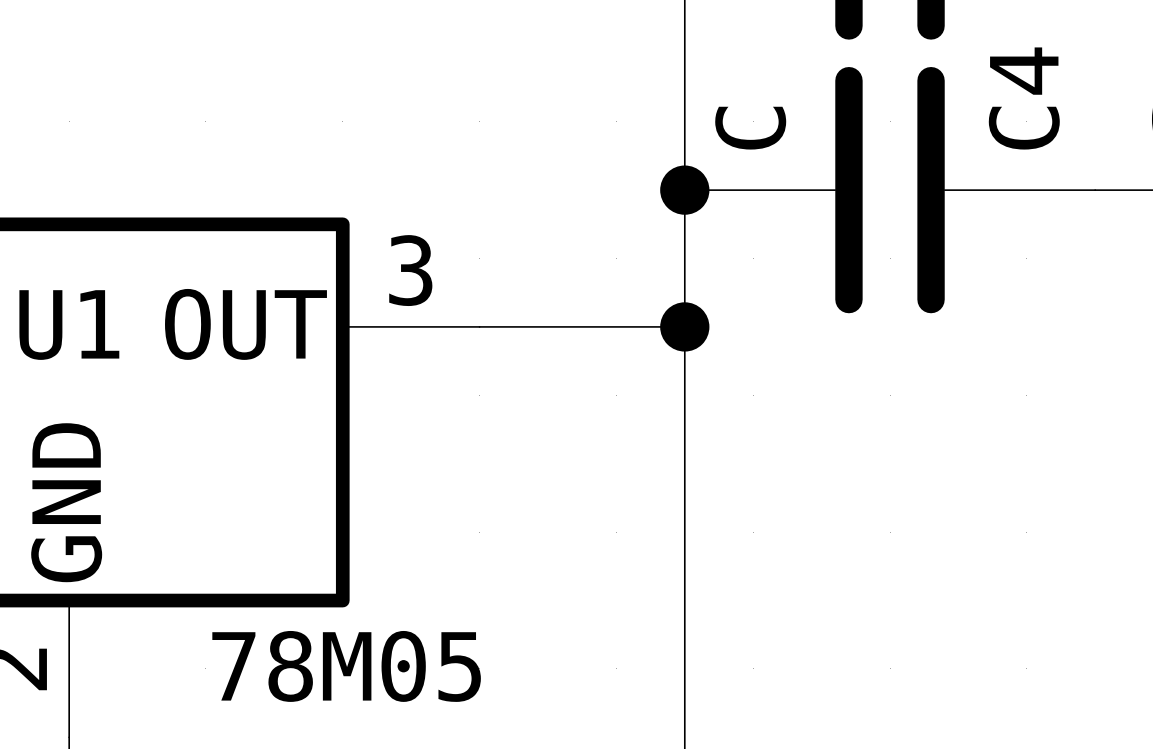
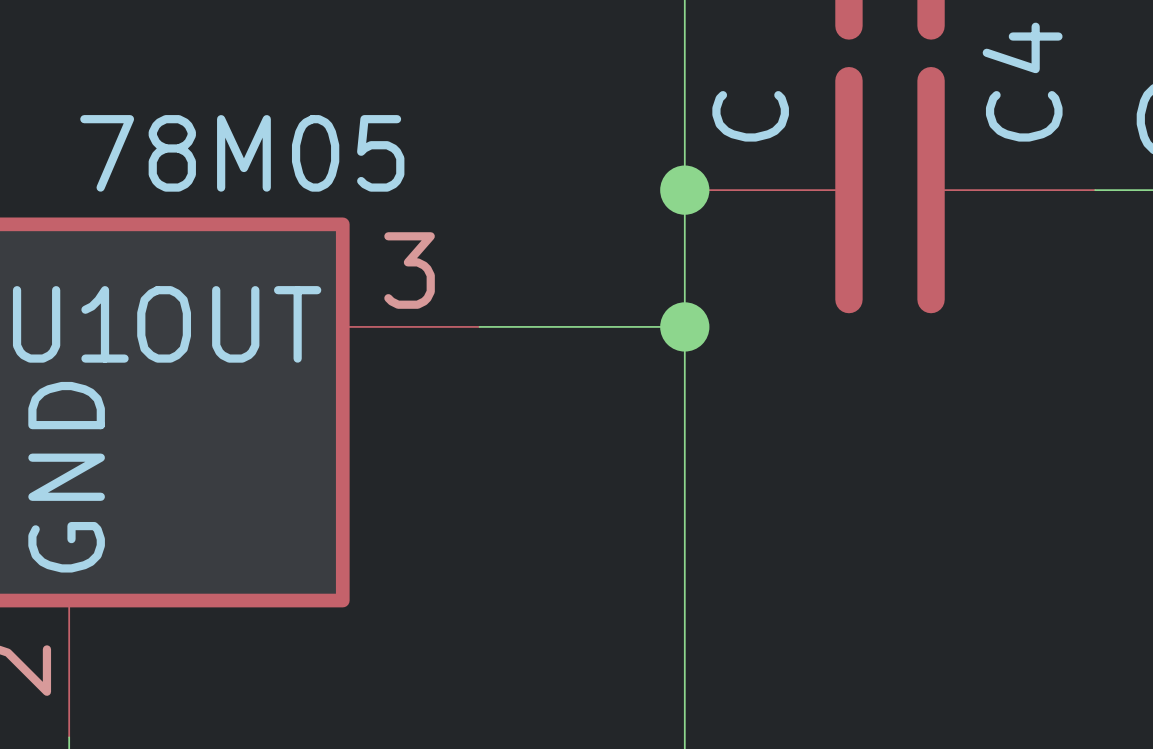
U1 value position: 78M05 (346, 666) -> 78M05 (242, 153)

